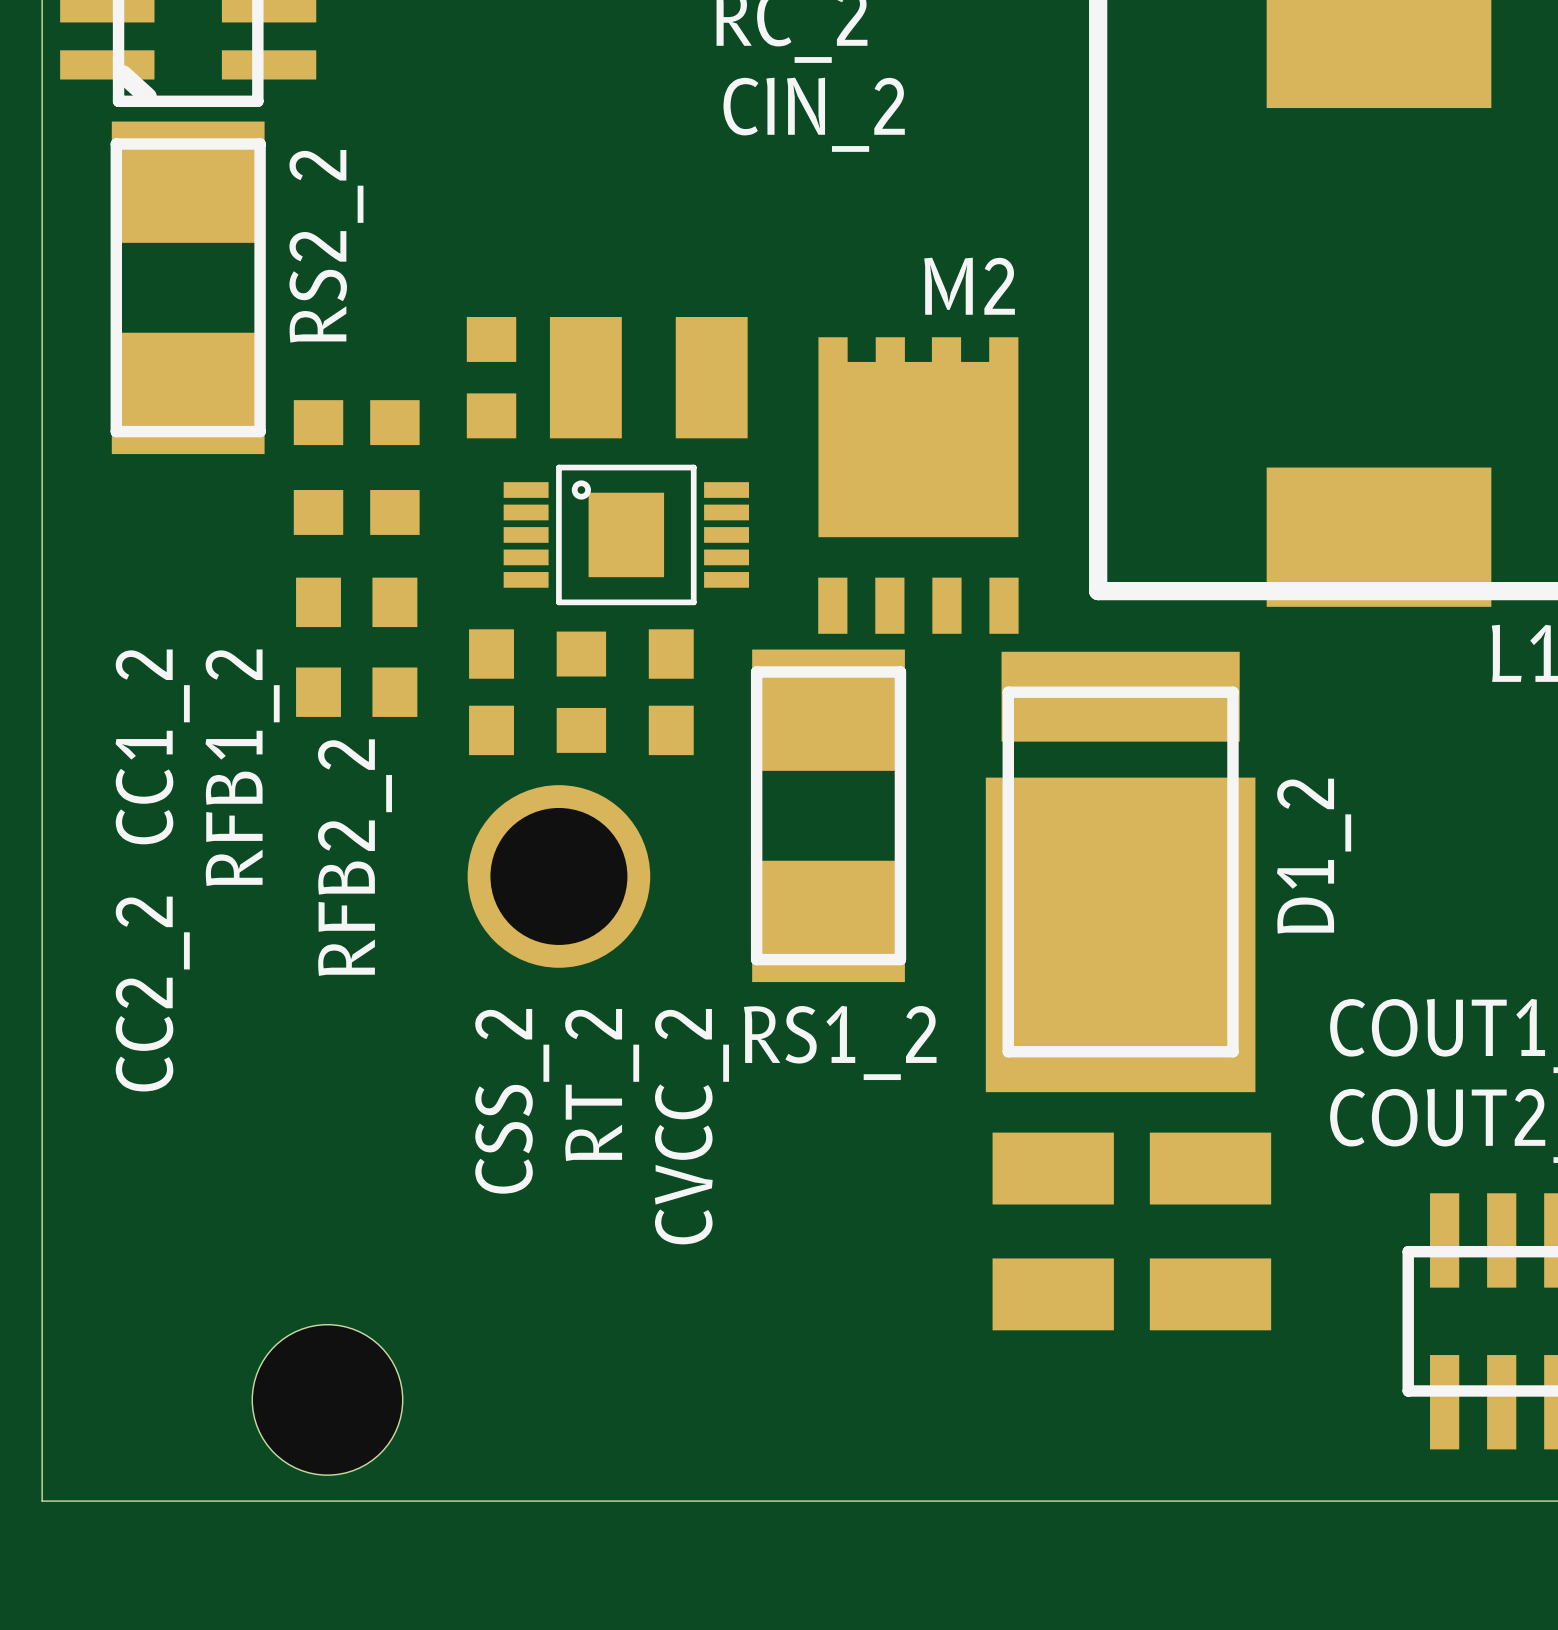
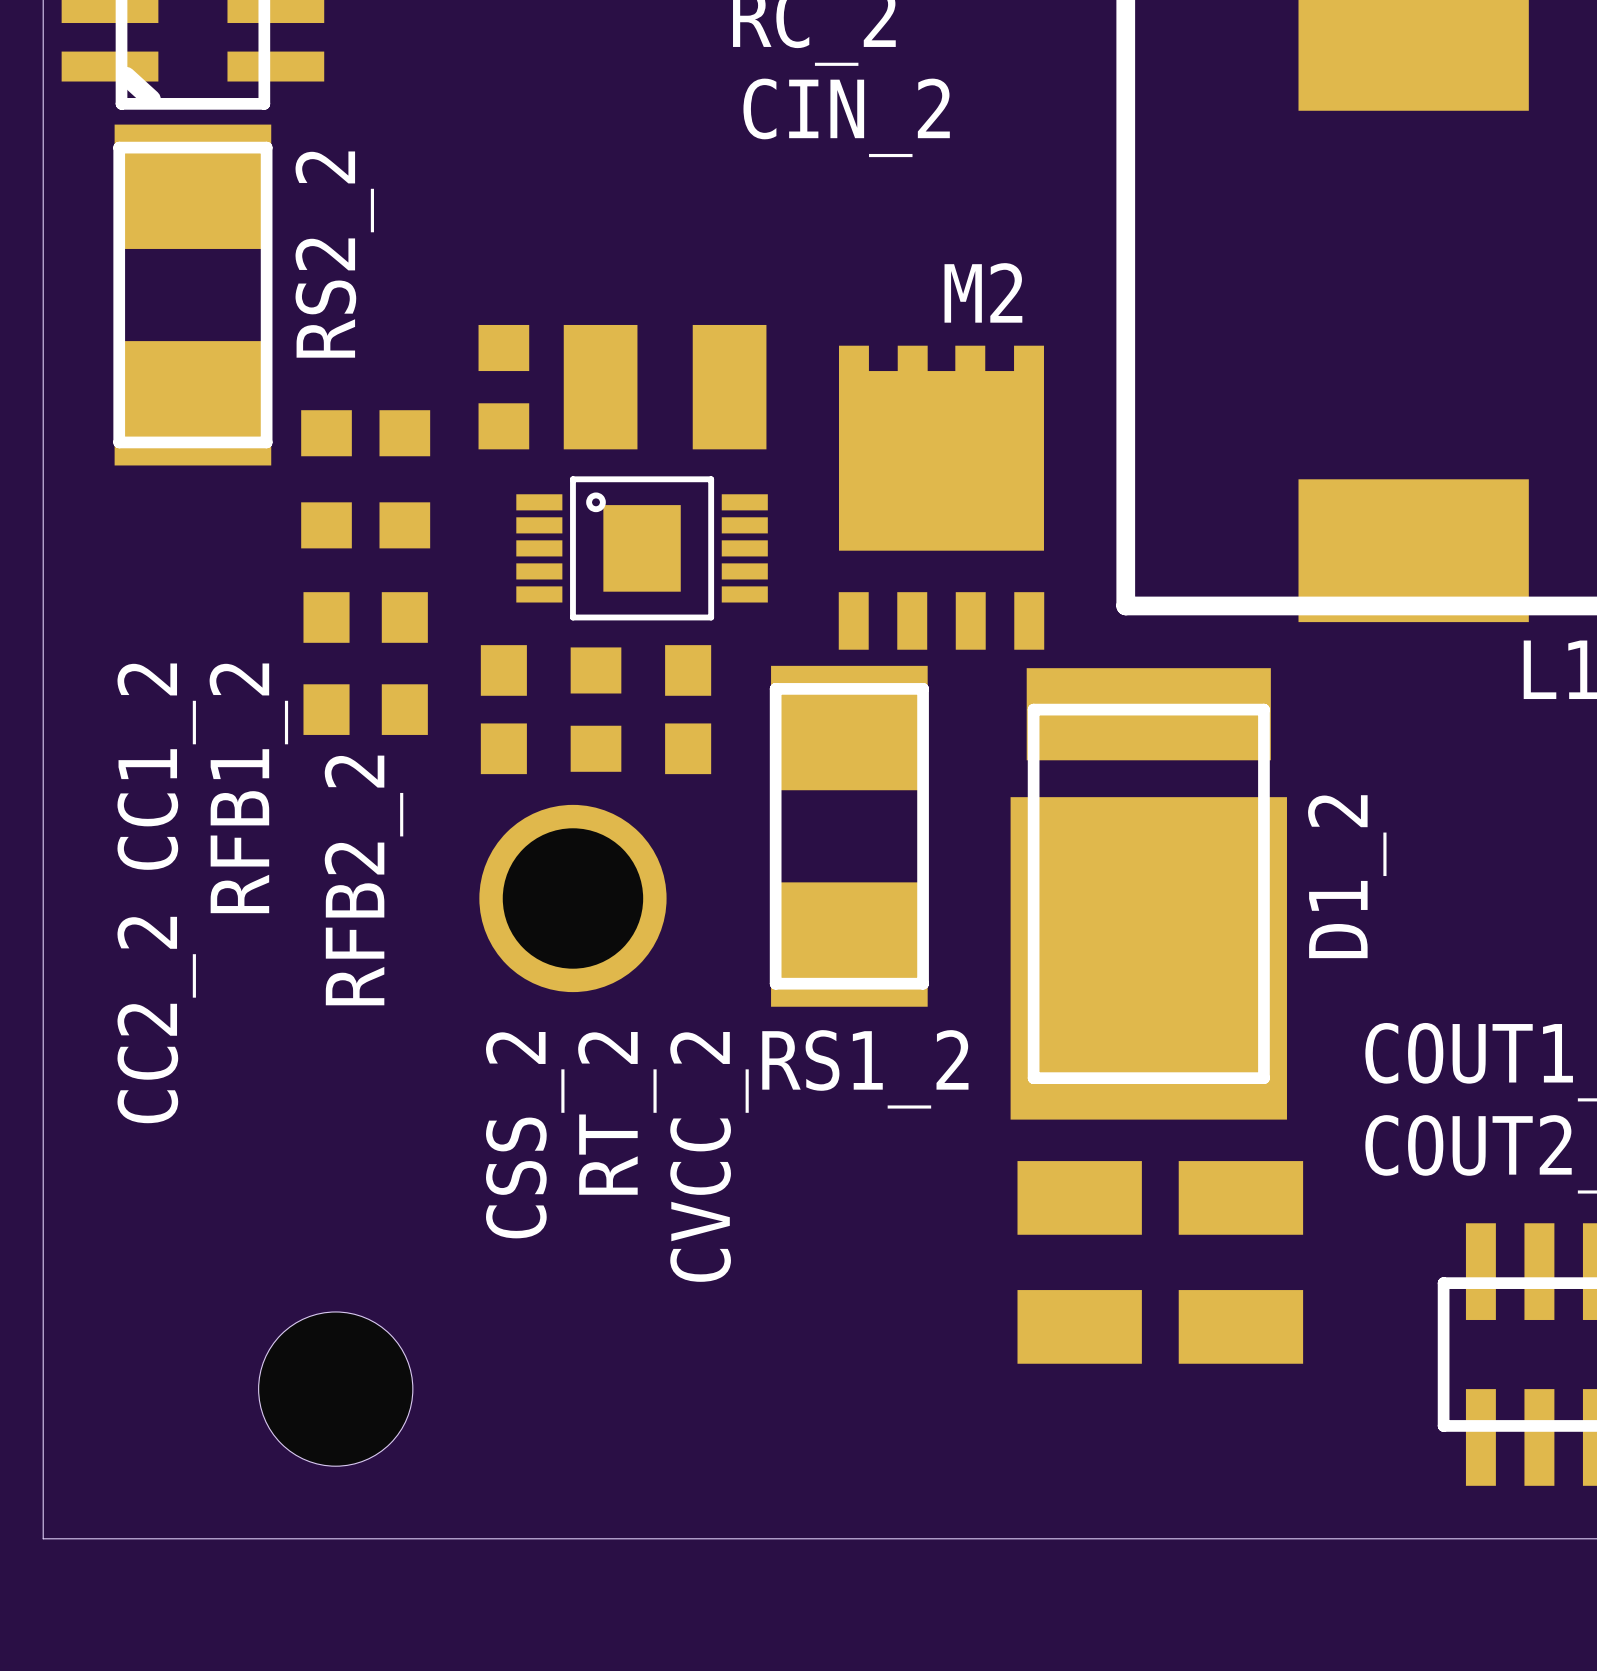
hole position: (327, 1399) -> (335, 1389)

